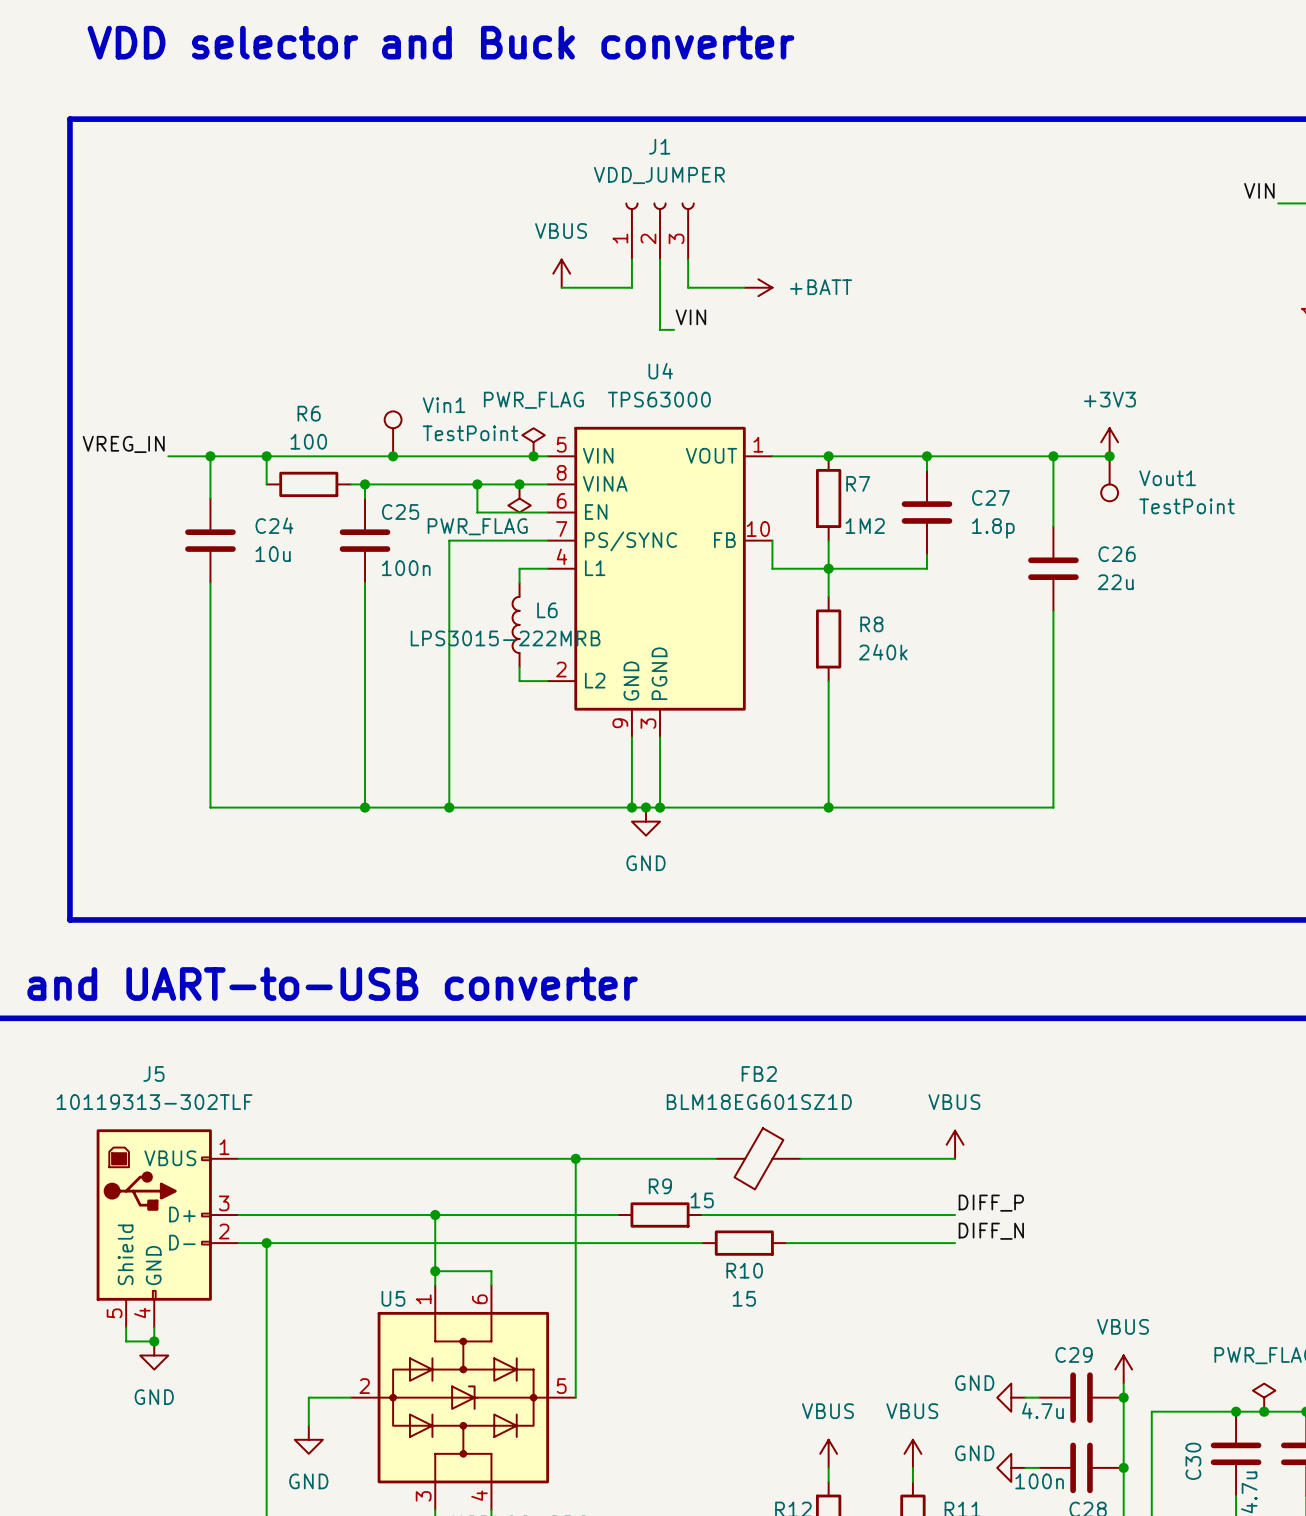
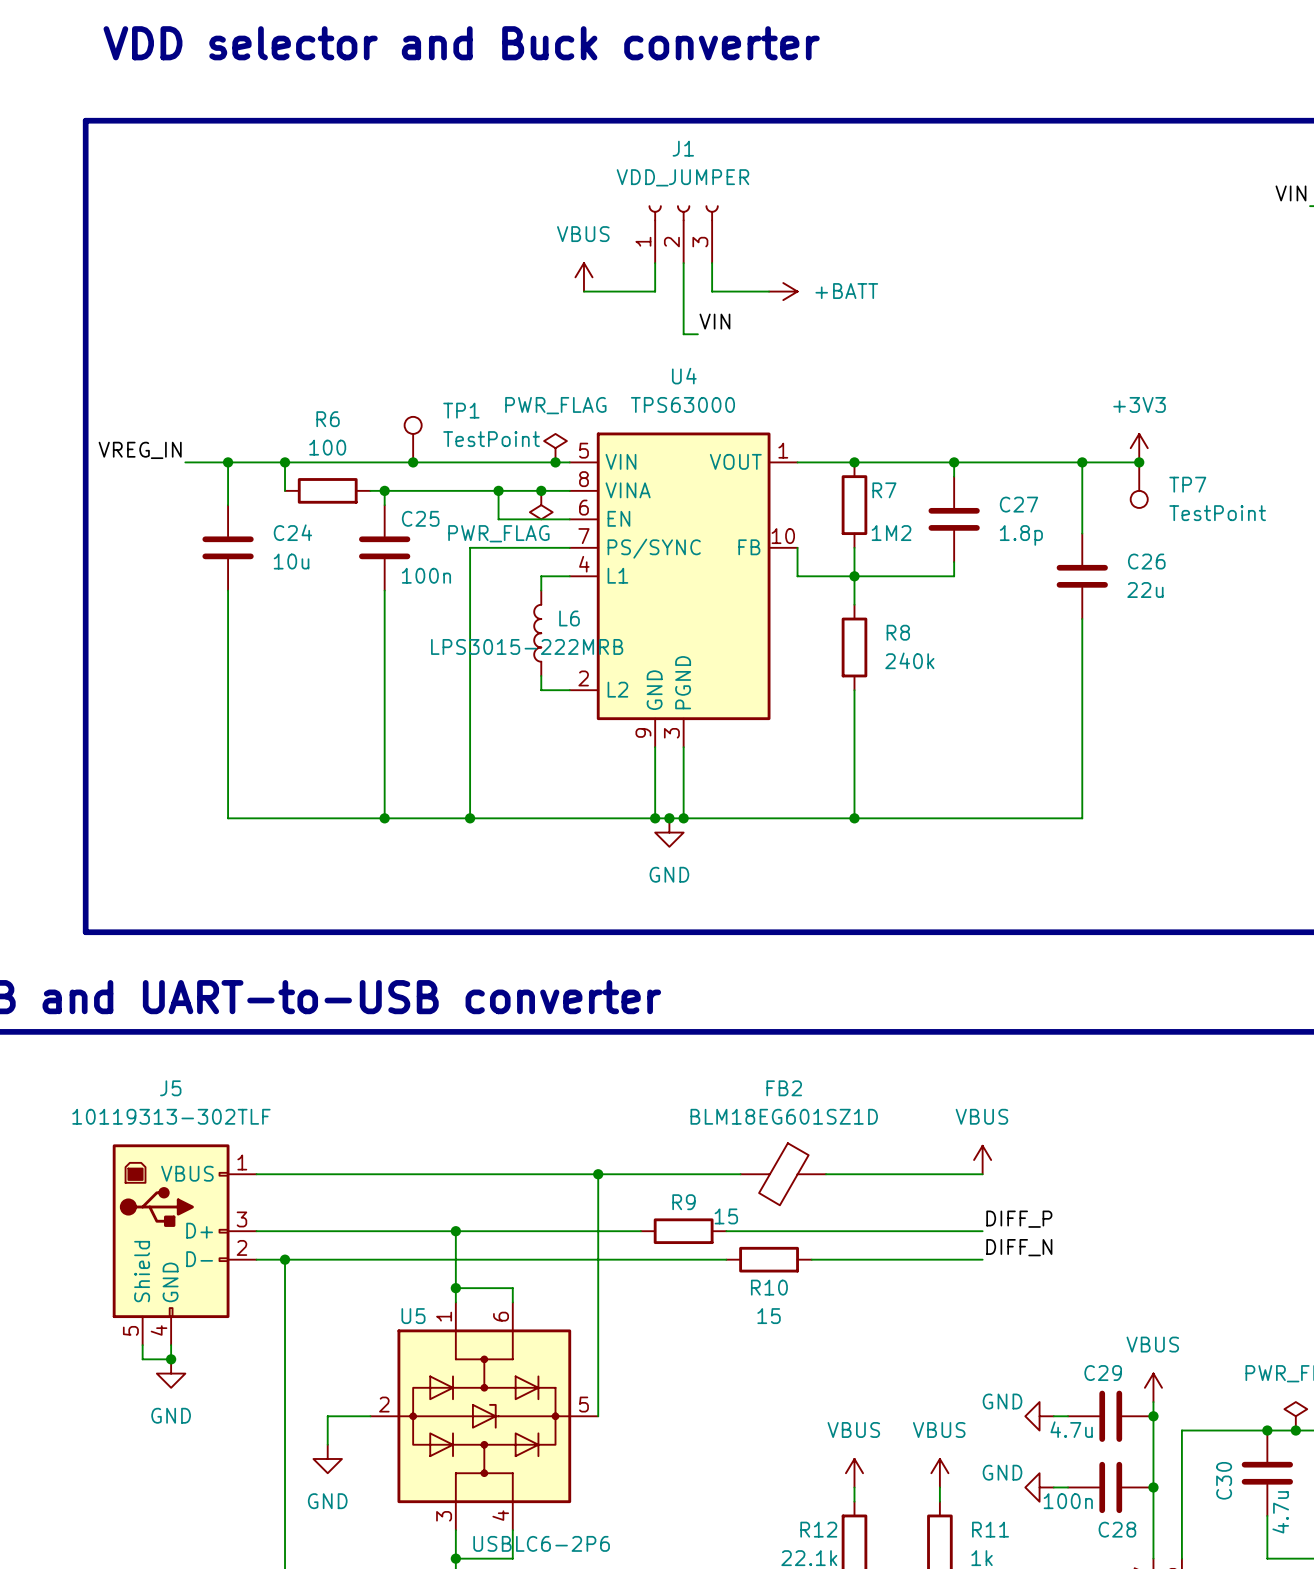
Vin1 name: Vin1 (444, 405) -> TP1 (461, 410)
Vout1 name: Vout1 (1167, 478) -> TP7 (1187, 484)

